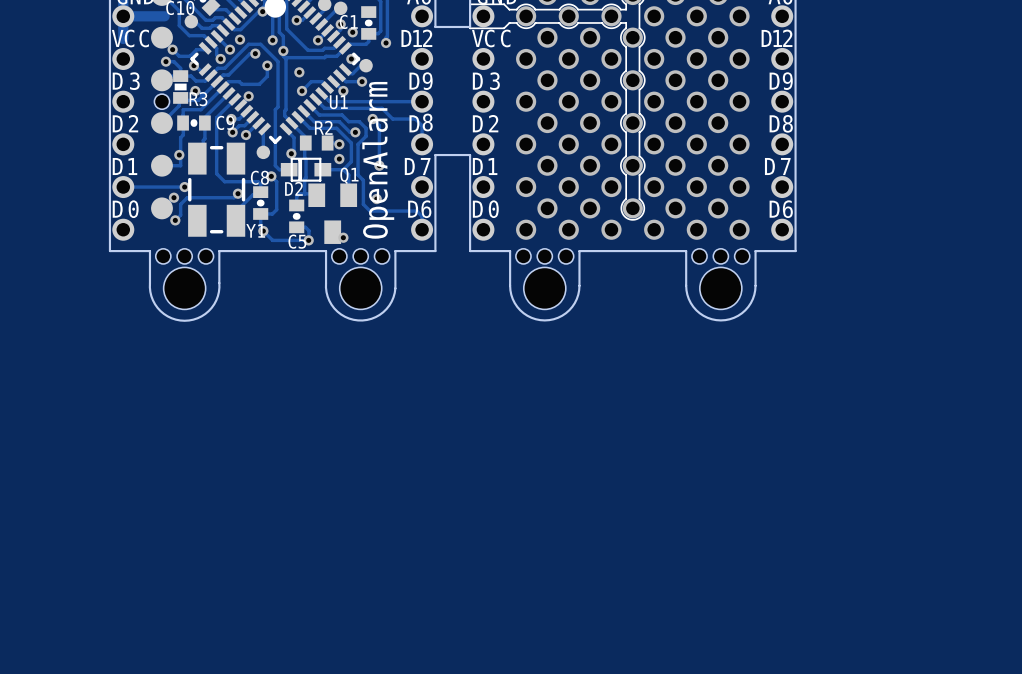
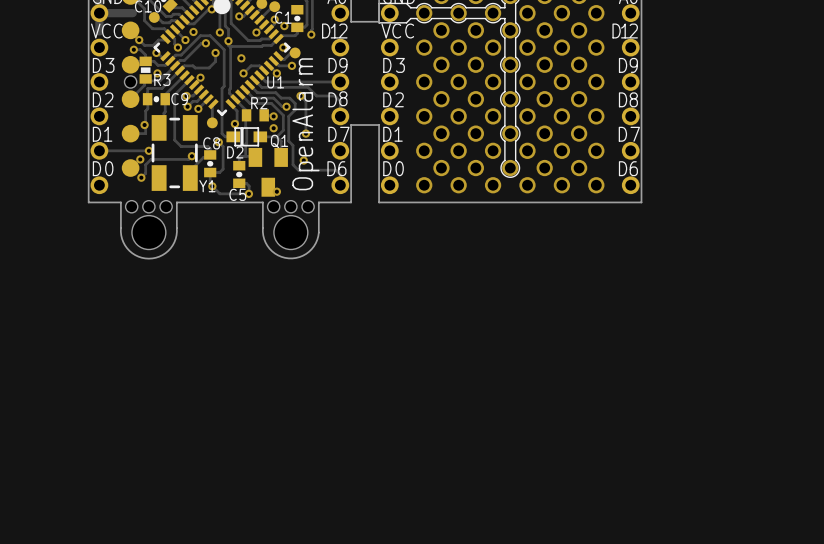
board edge: (510, 251) (510, 290) (514, 303) (527, 315) (544, 320) (562, 315) (574, 303) (579, 290) (579, 251) -> (411, 202) (467, 202)
board edge: (686, 251) (686, 290) (690, 303) (703, 315) (720, 320) (738, 315) (750, 303) (755, 290) (755, 251) -> (553, 202) (609, 202)
hole: (523, 256) -> none
hole: (544, 256) -> none
hole: (566, 256) -> none
hole: (699, 256) -> none
hole: (720, 256) -> none
hole: (742, 256) -> none
hole: (544, 288) -> none
hole: (720, 288) -> none

